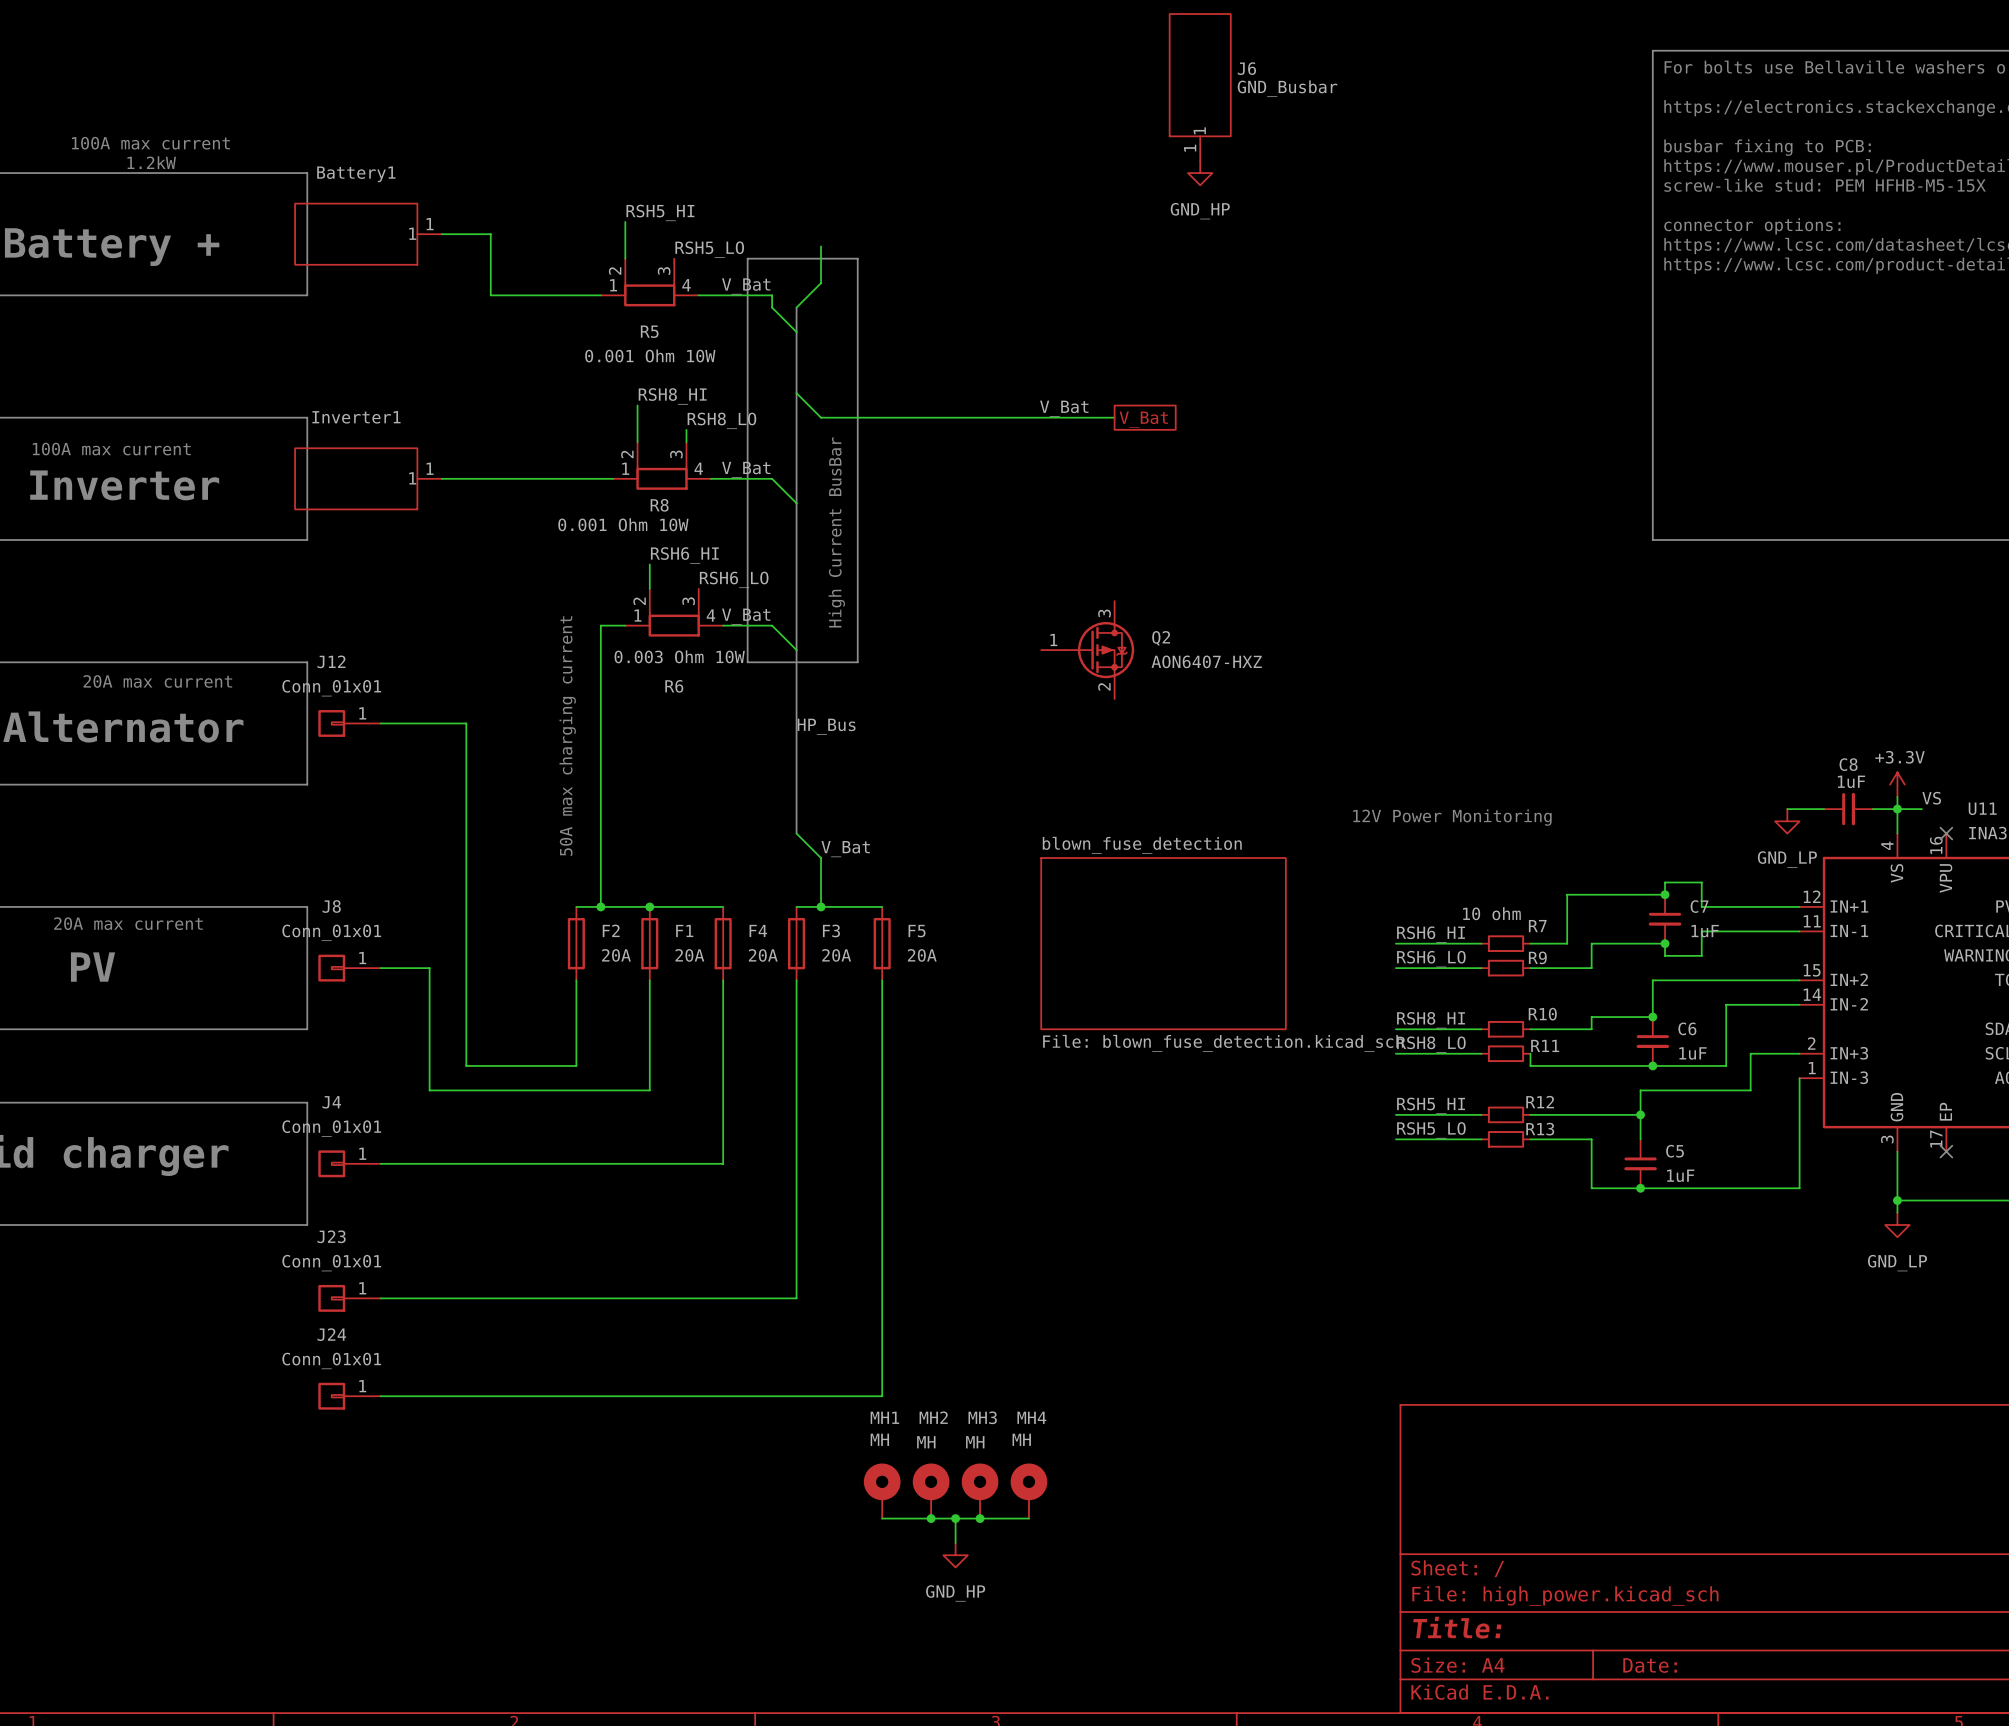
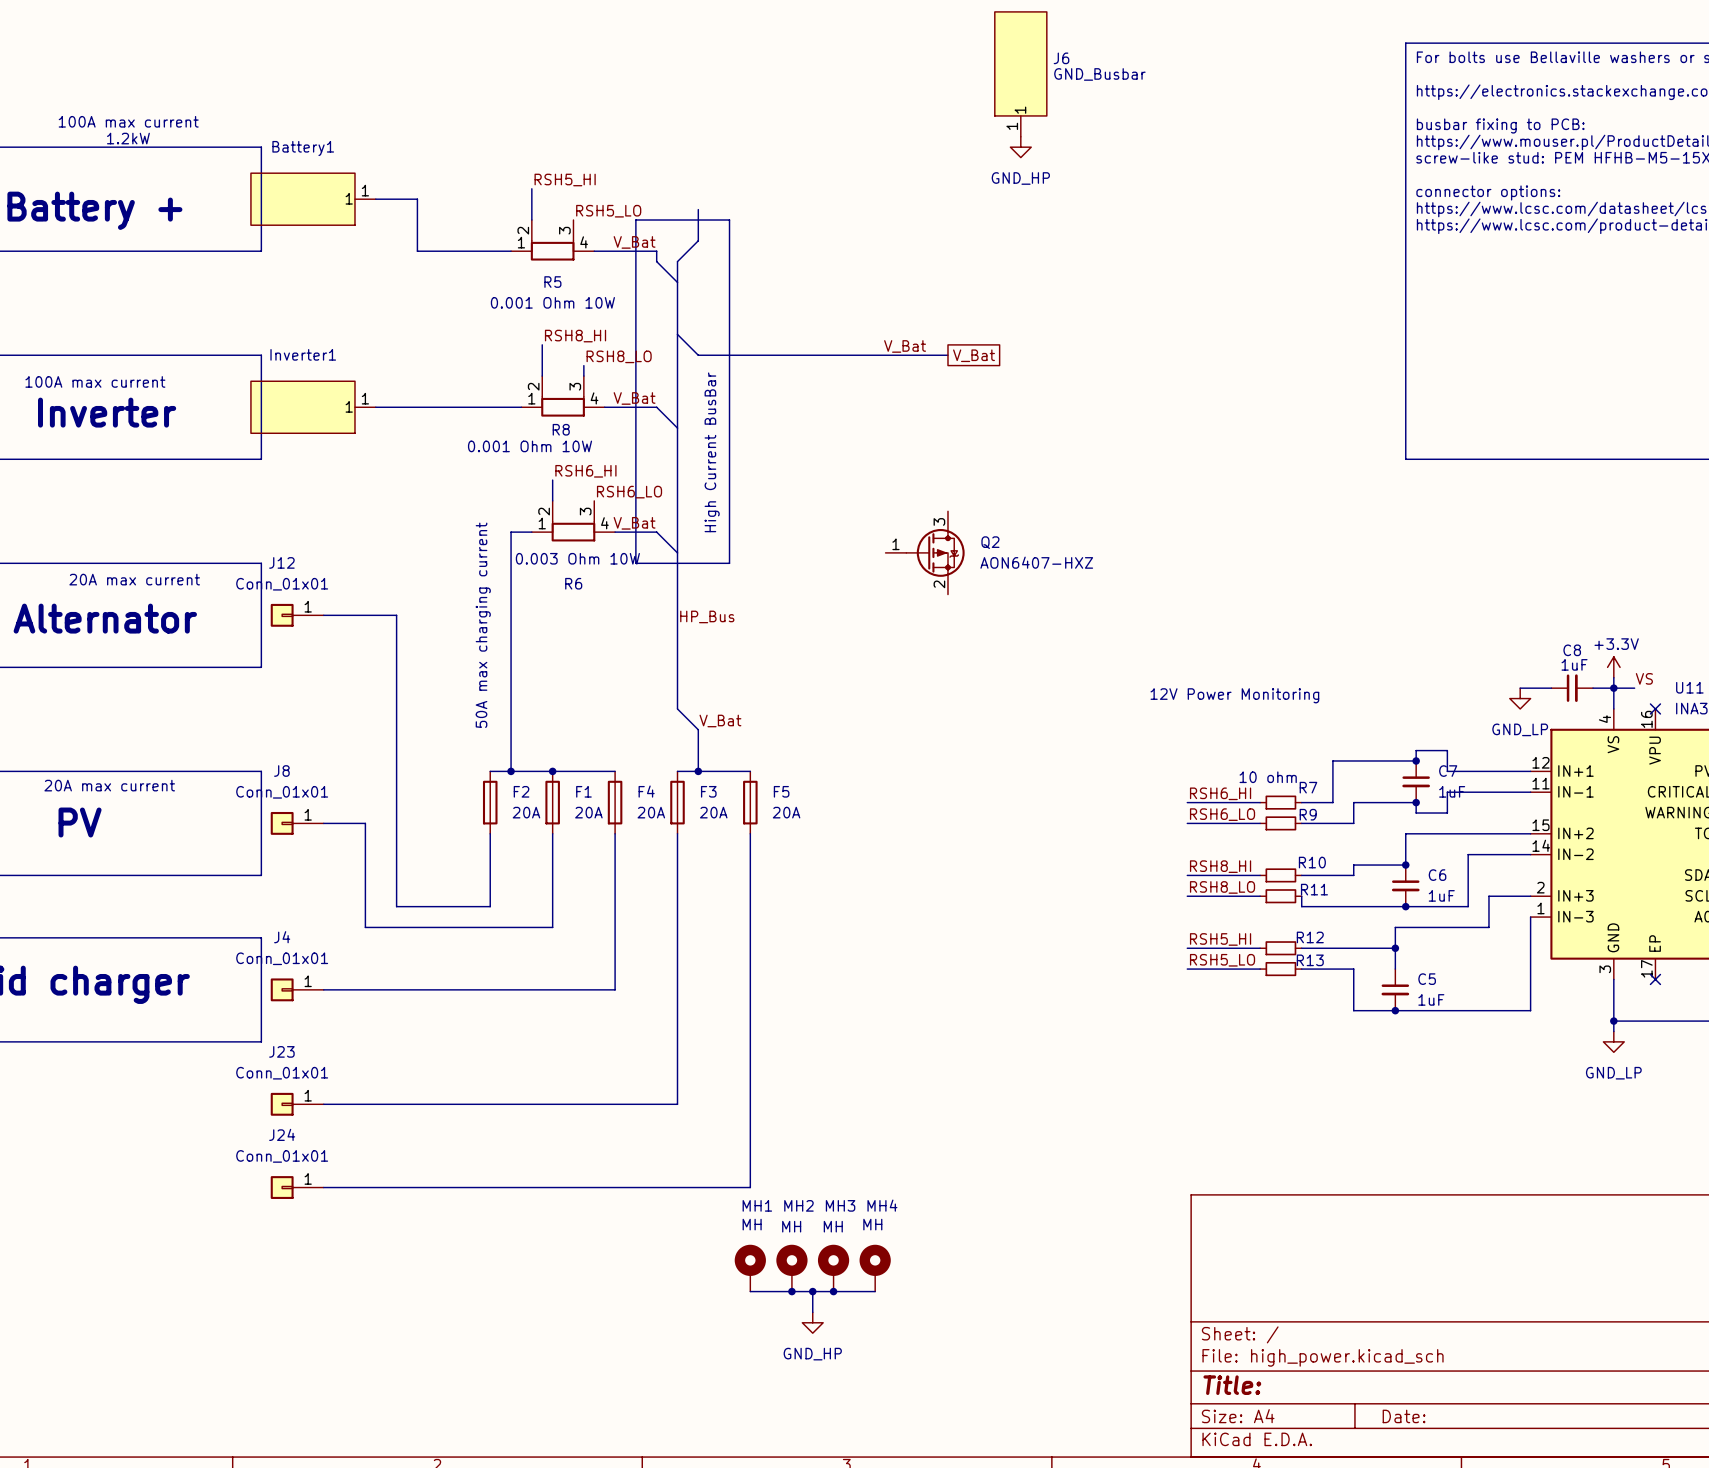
sheet blown_fuse_detection: File: blown_fuse_detection.kicad_sch (1163, 943) -> none

